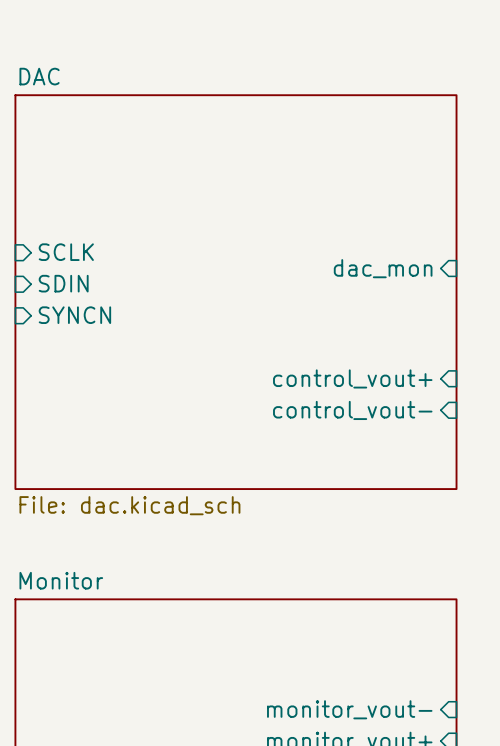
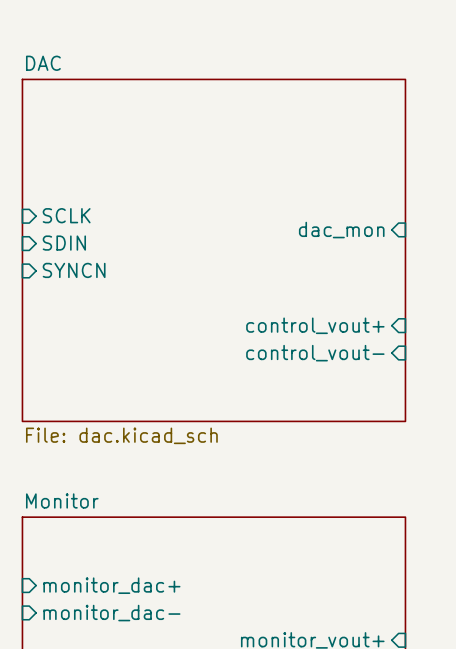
sheet pin: none -> monitor_dac+ (111, 585)
sheet pin: none -> monitor_dac- (111, 613)
sheet pin: monitor_vout- (349, 709) -> none

